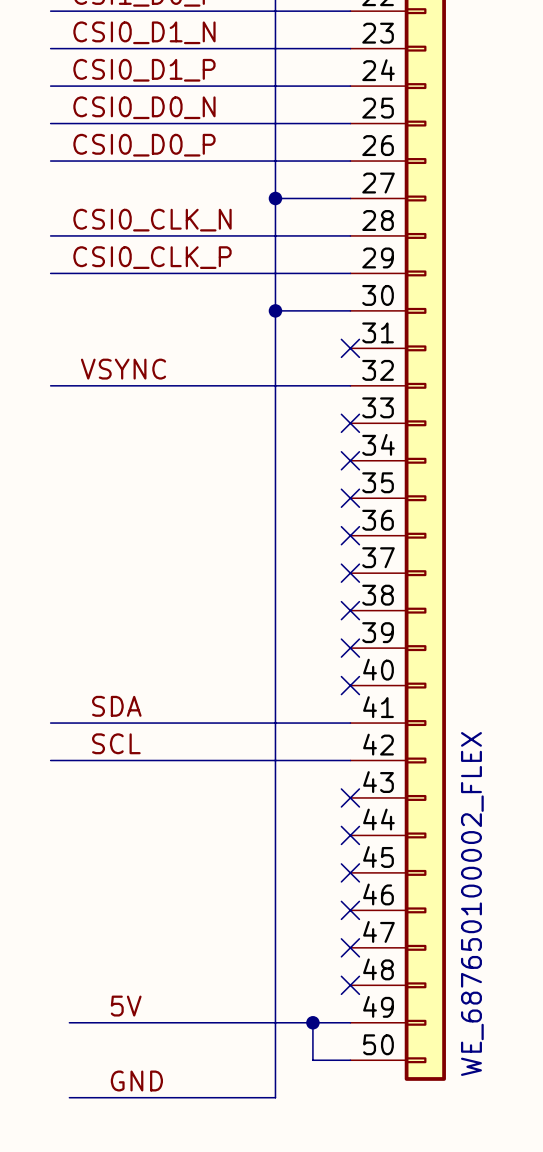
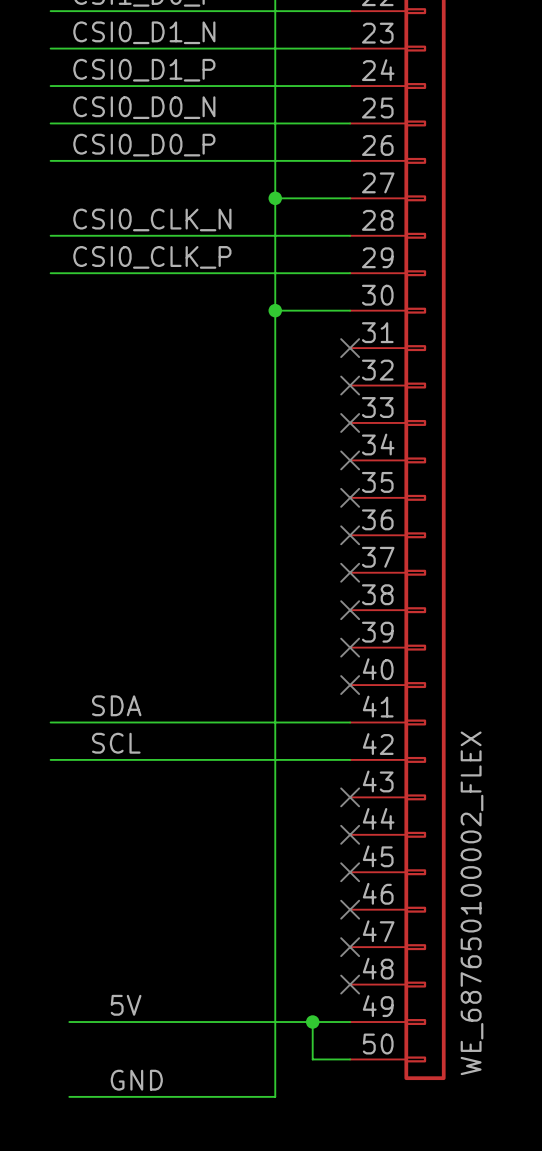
label: VSYNC (123, 369) -> none
wire: (50, 385) (350, 385) -> none
no-connect mark: none -> (350, 385)

